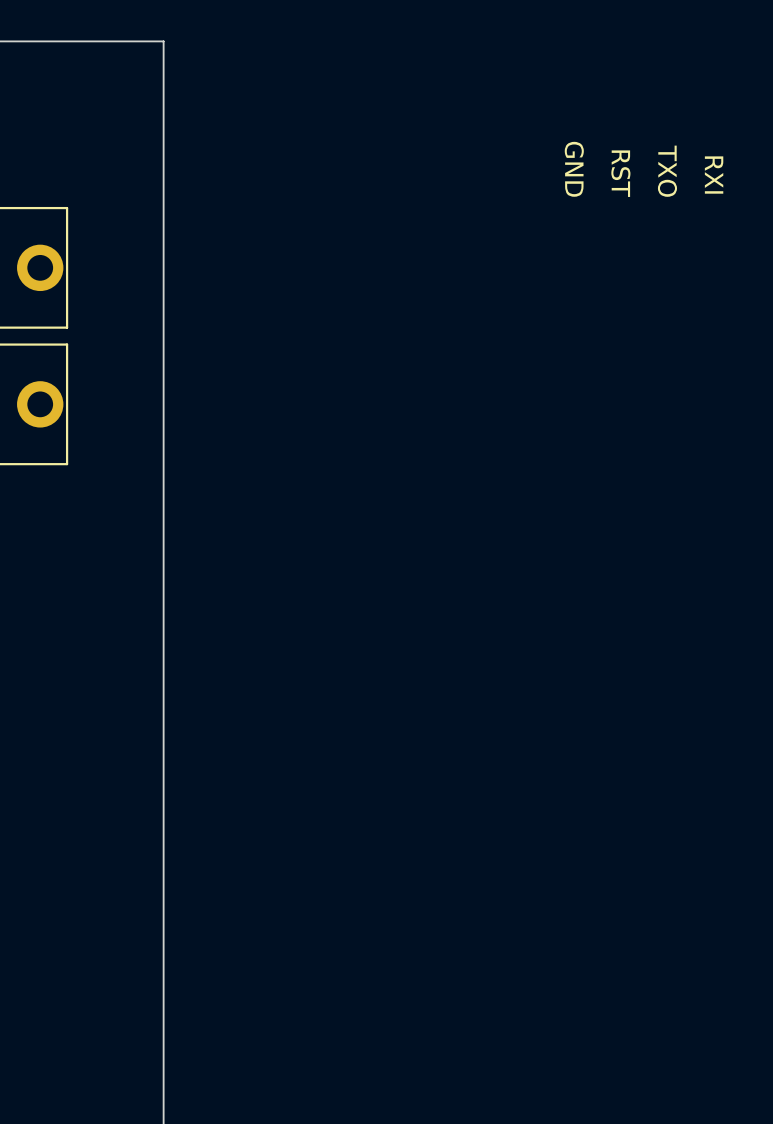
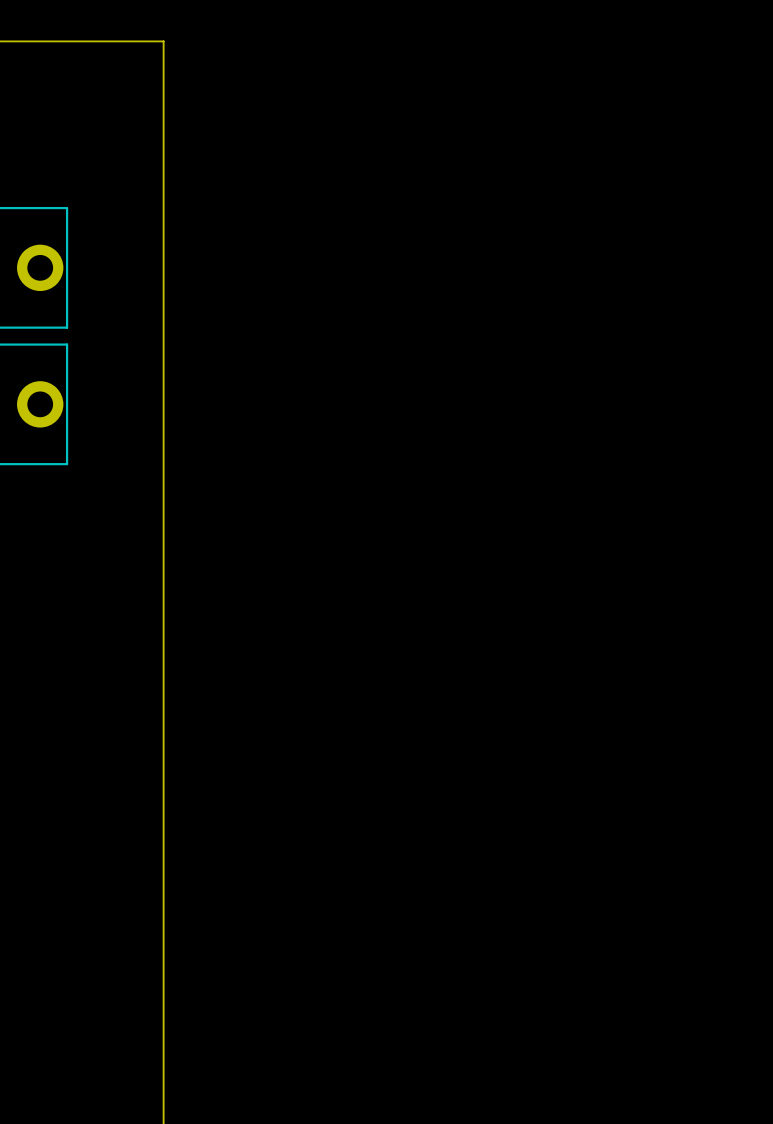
text: GND (574, 169) -> none
text: TXO (667, 171) -> none
text: RST (620, 173) -> none
text: RXI (714, 175) -> none

